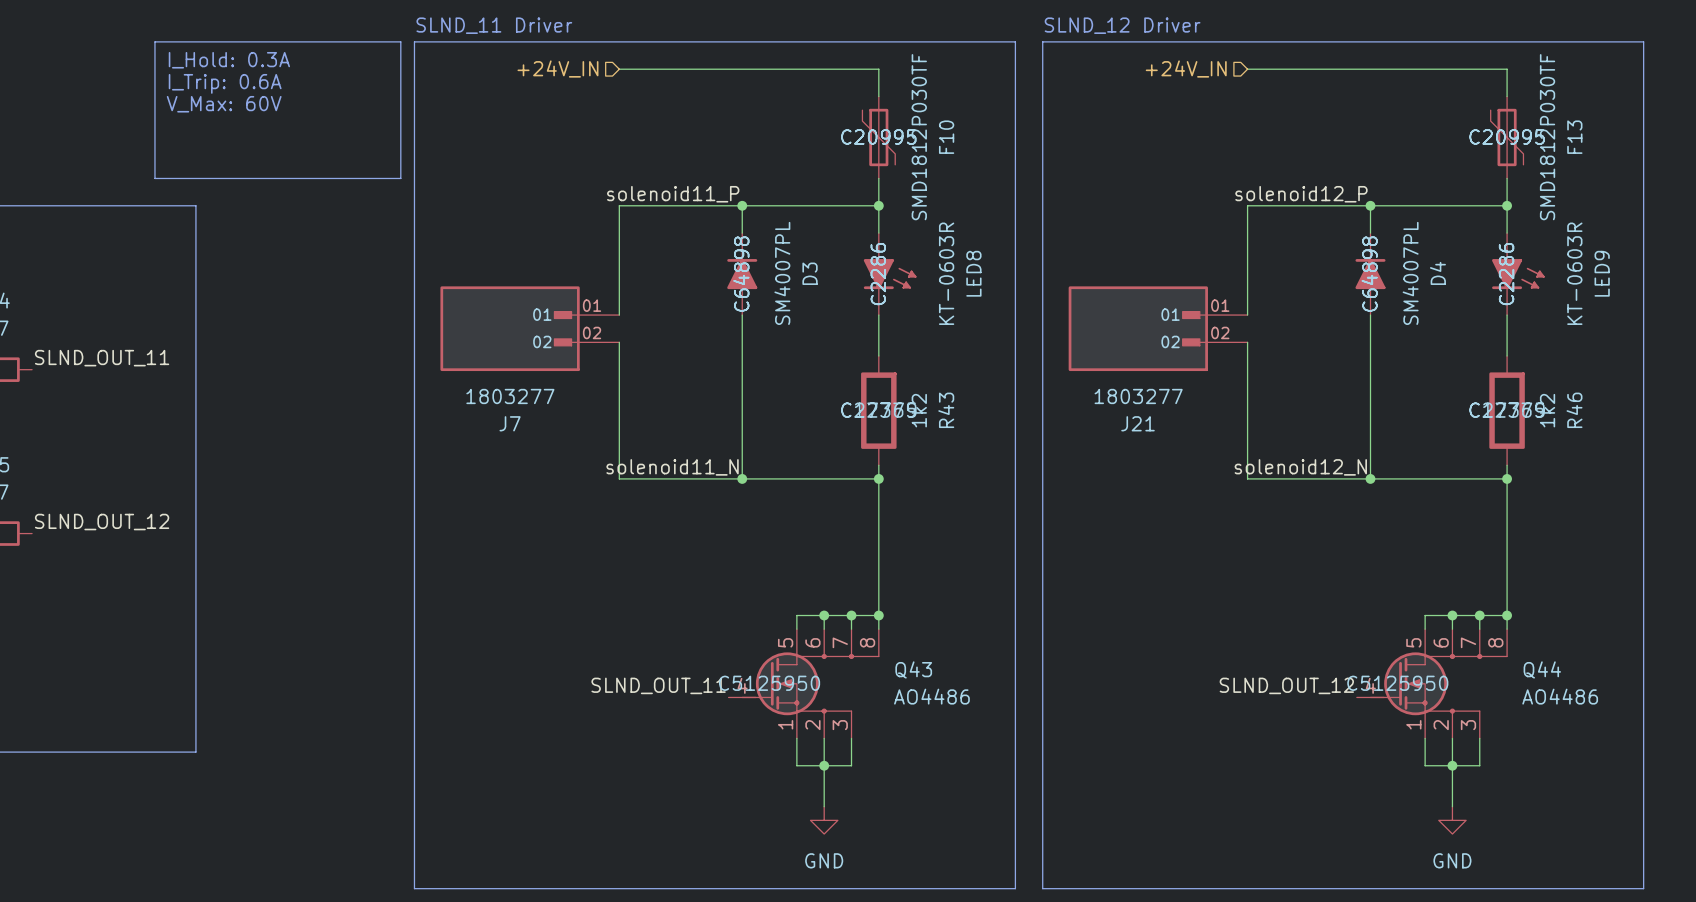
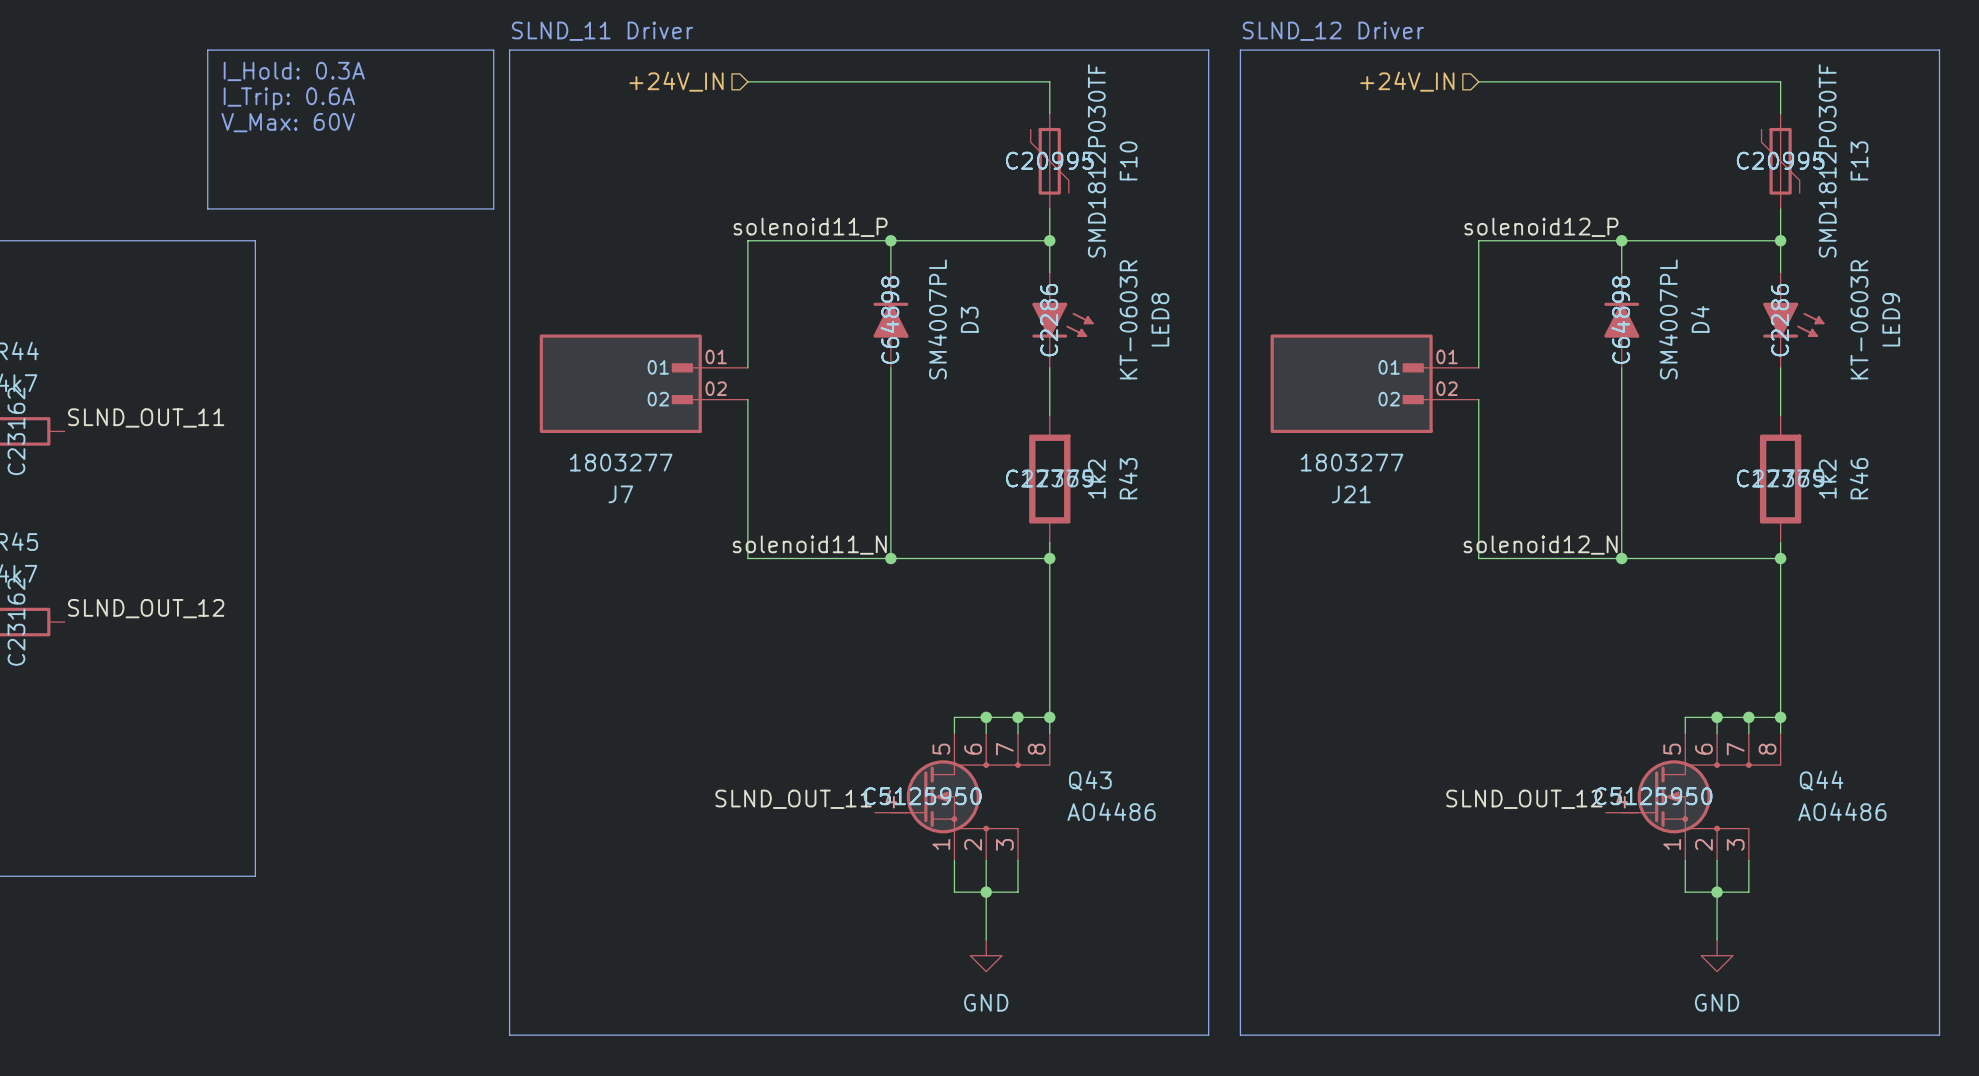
Q43 text: none -> C5125950 (922, 796)
Q44 text: none -> C5125950 (1653, 796)

